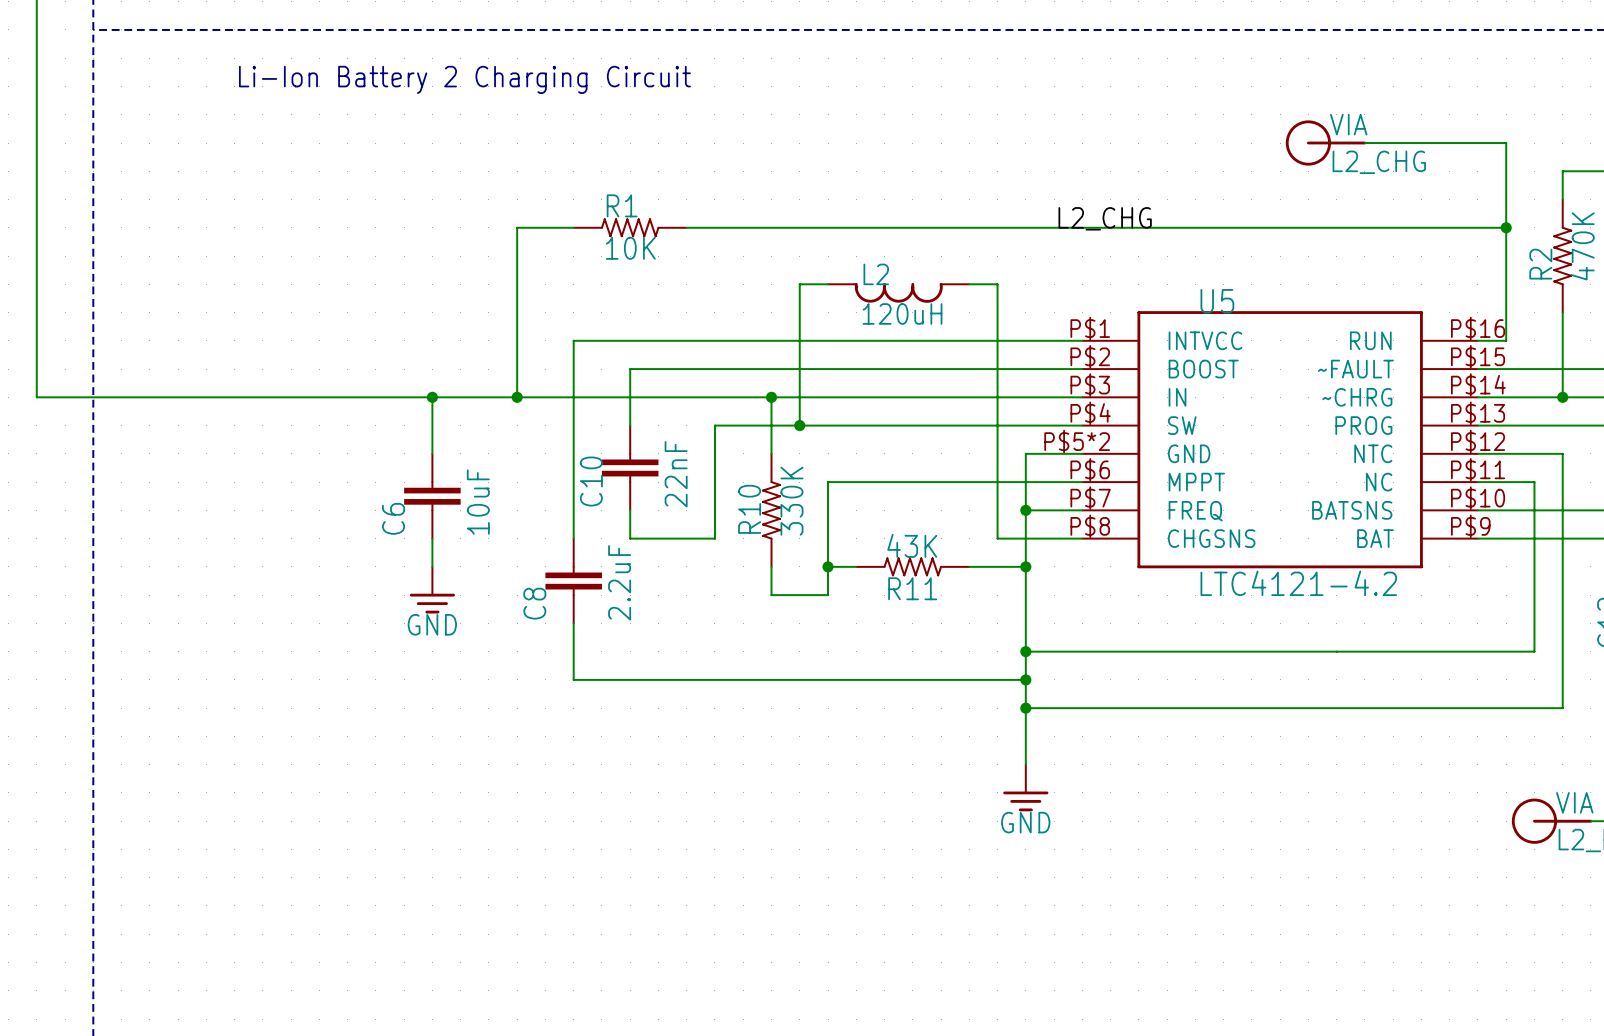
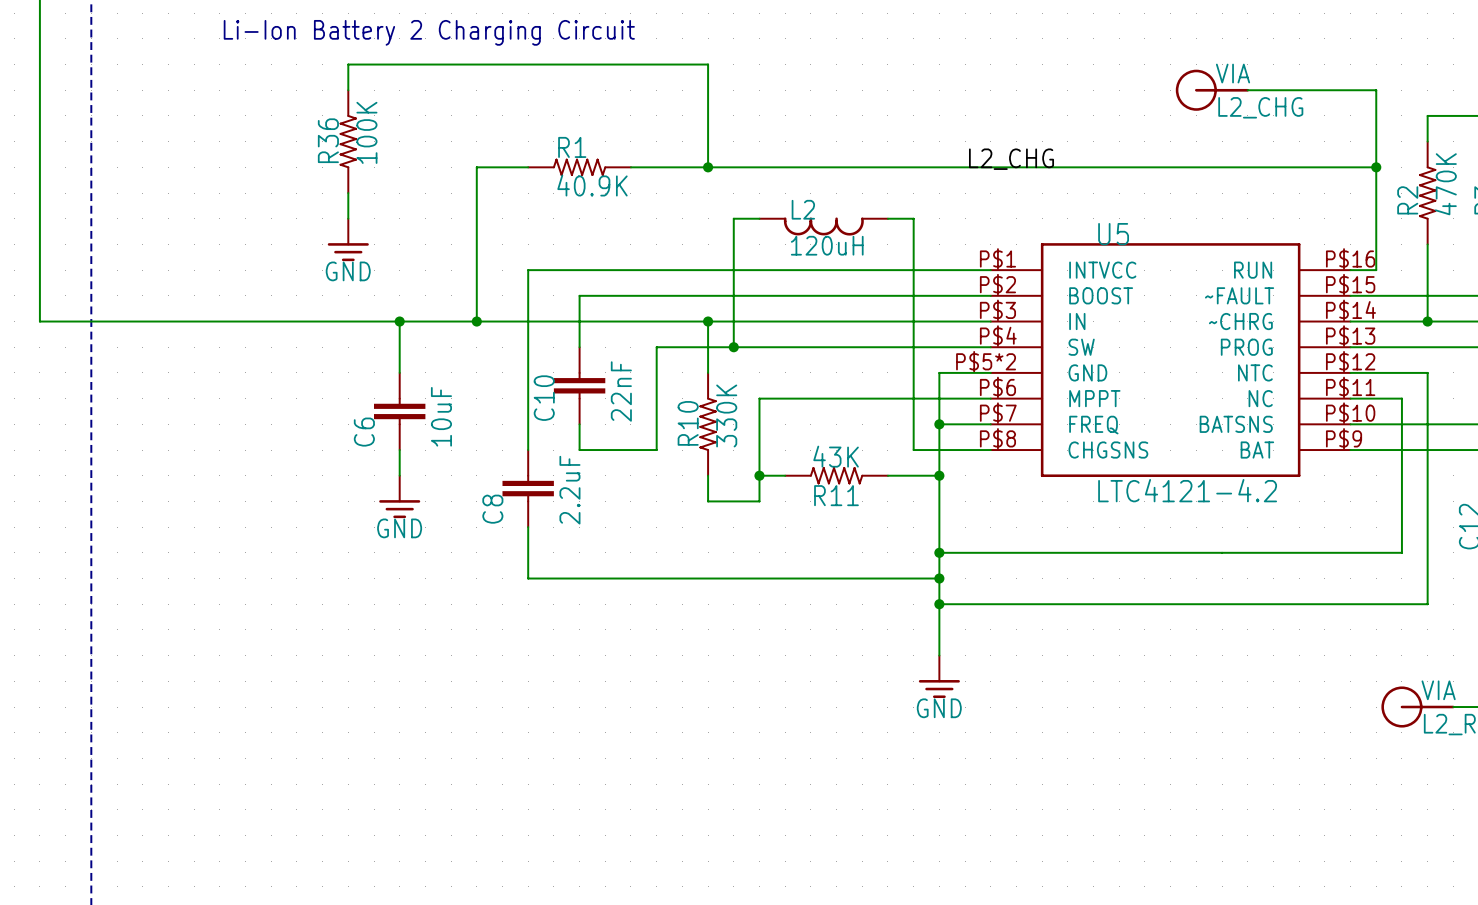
wire: none -> (348, 90) (348, 64) (708, 64) (708, 167)
R36: none -> 100K (348, 141)
junction: none -> (708, 167)
R1 value: 10K (630, 248) -> 40.9K (592, 185)
wire: none -> (348, 193) (348, 218)
power symbol: none -> GND (348, 239)

